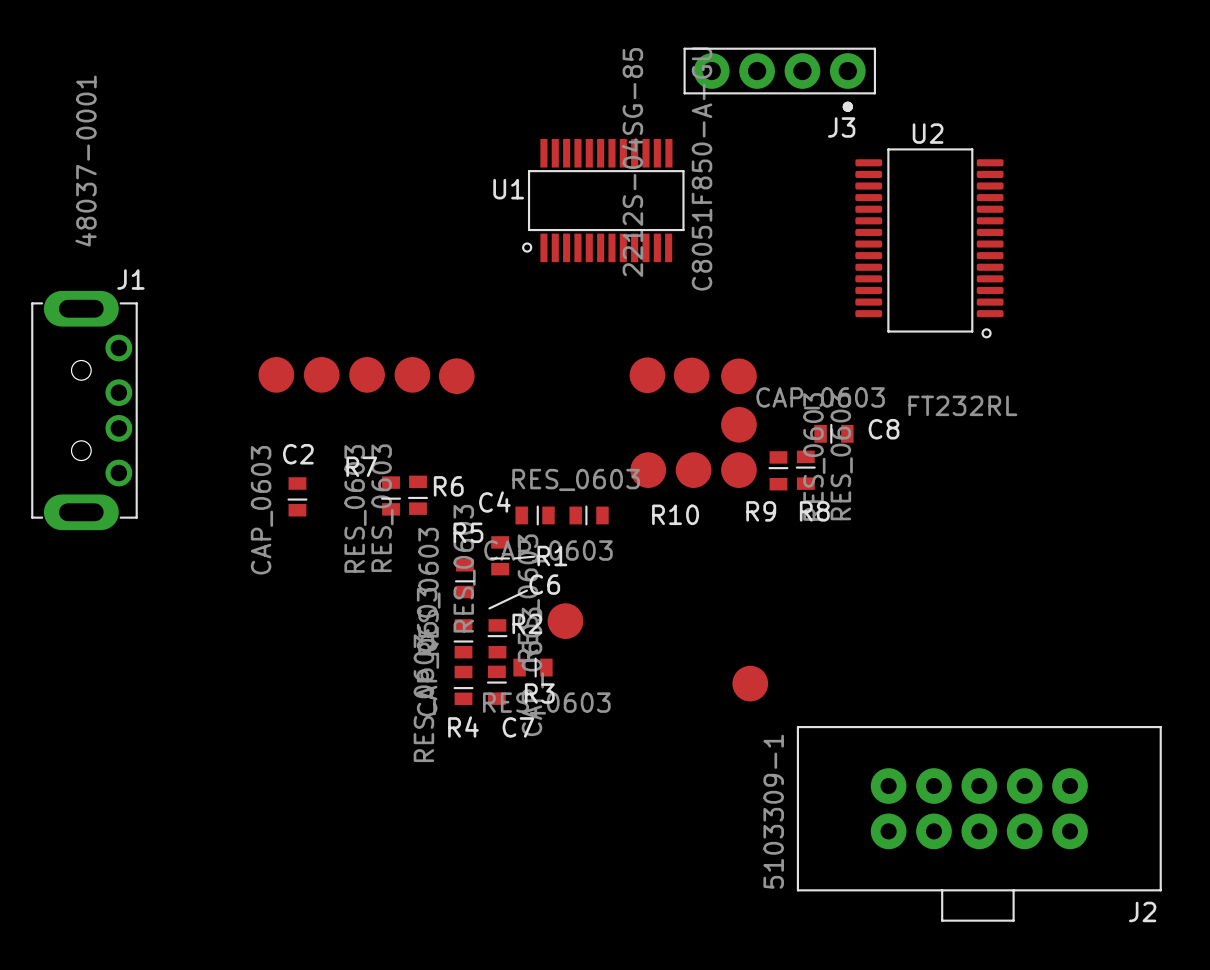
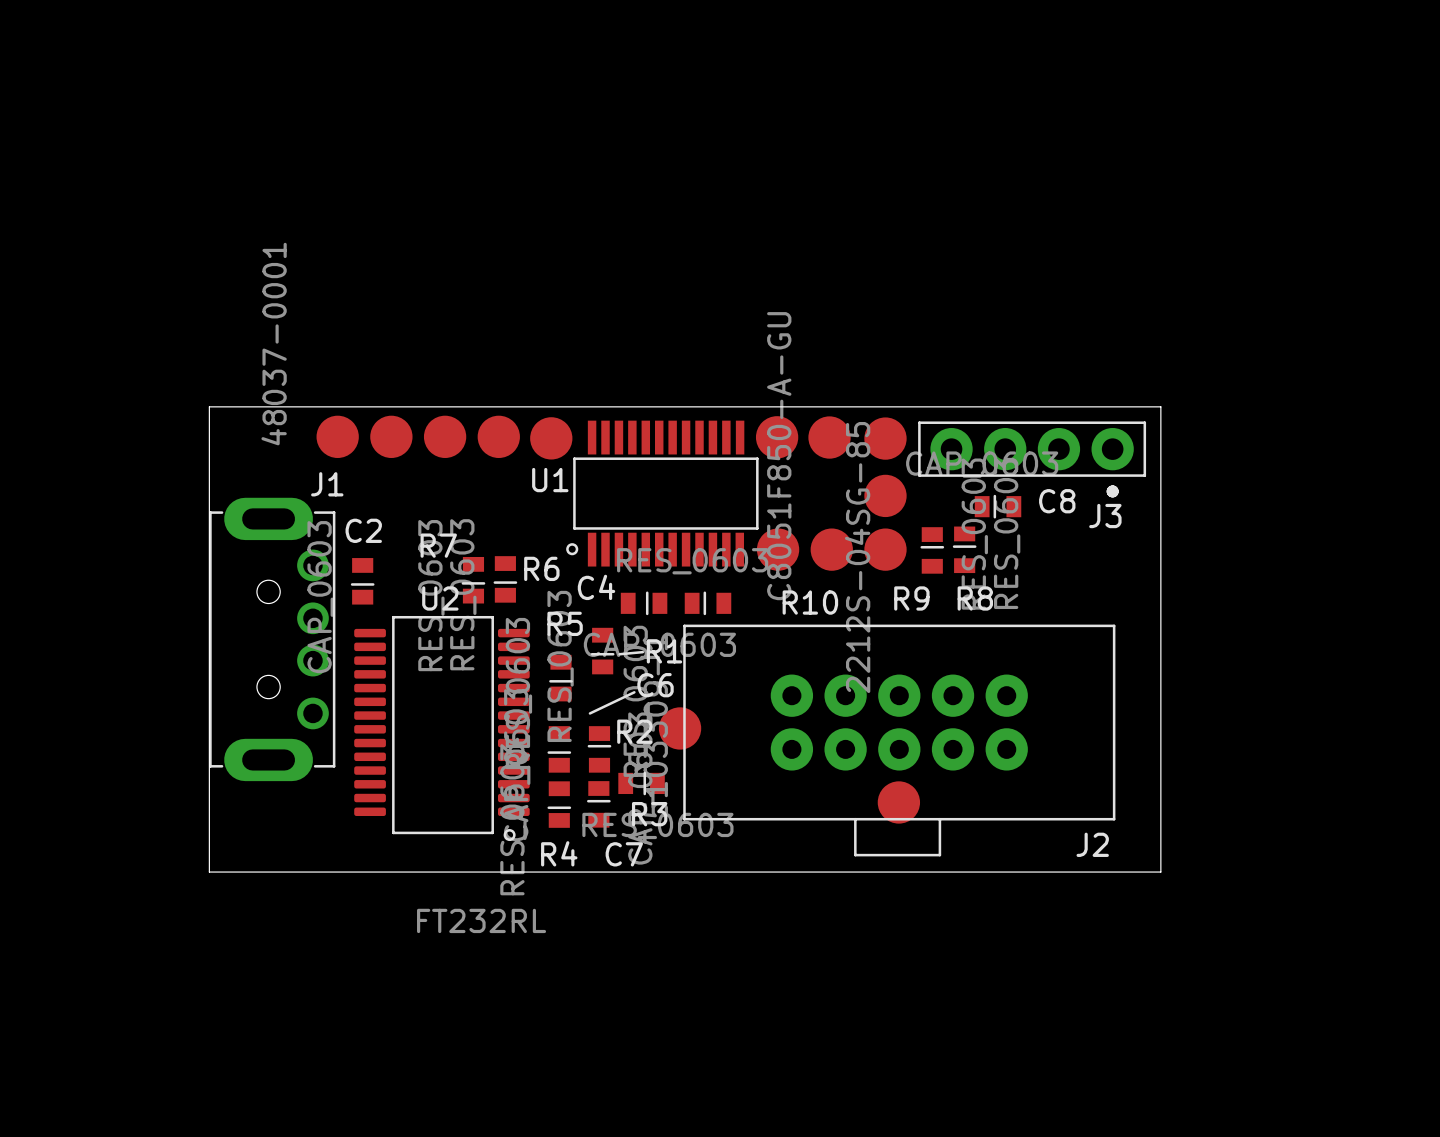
J3 position: (779, 79) -> (1032, 459)
U1 position: (603, 200) -> (662, 493)
U2 position: (929, 243) -> (441, 728)
board edge: none -> (209, 406) (209, 872) (1160, 872) (1160, 406) (209, 406)
J1 position: (84, 410) -> (272, 639)
J2 position: (979, 823) -> (899, 740)

